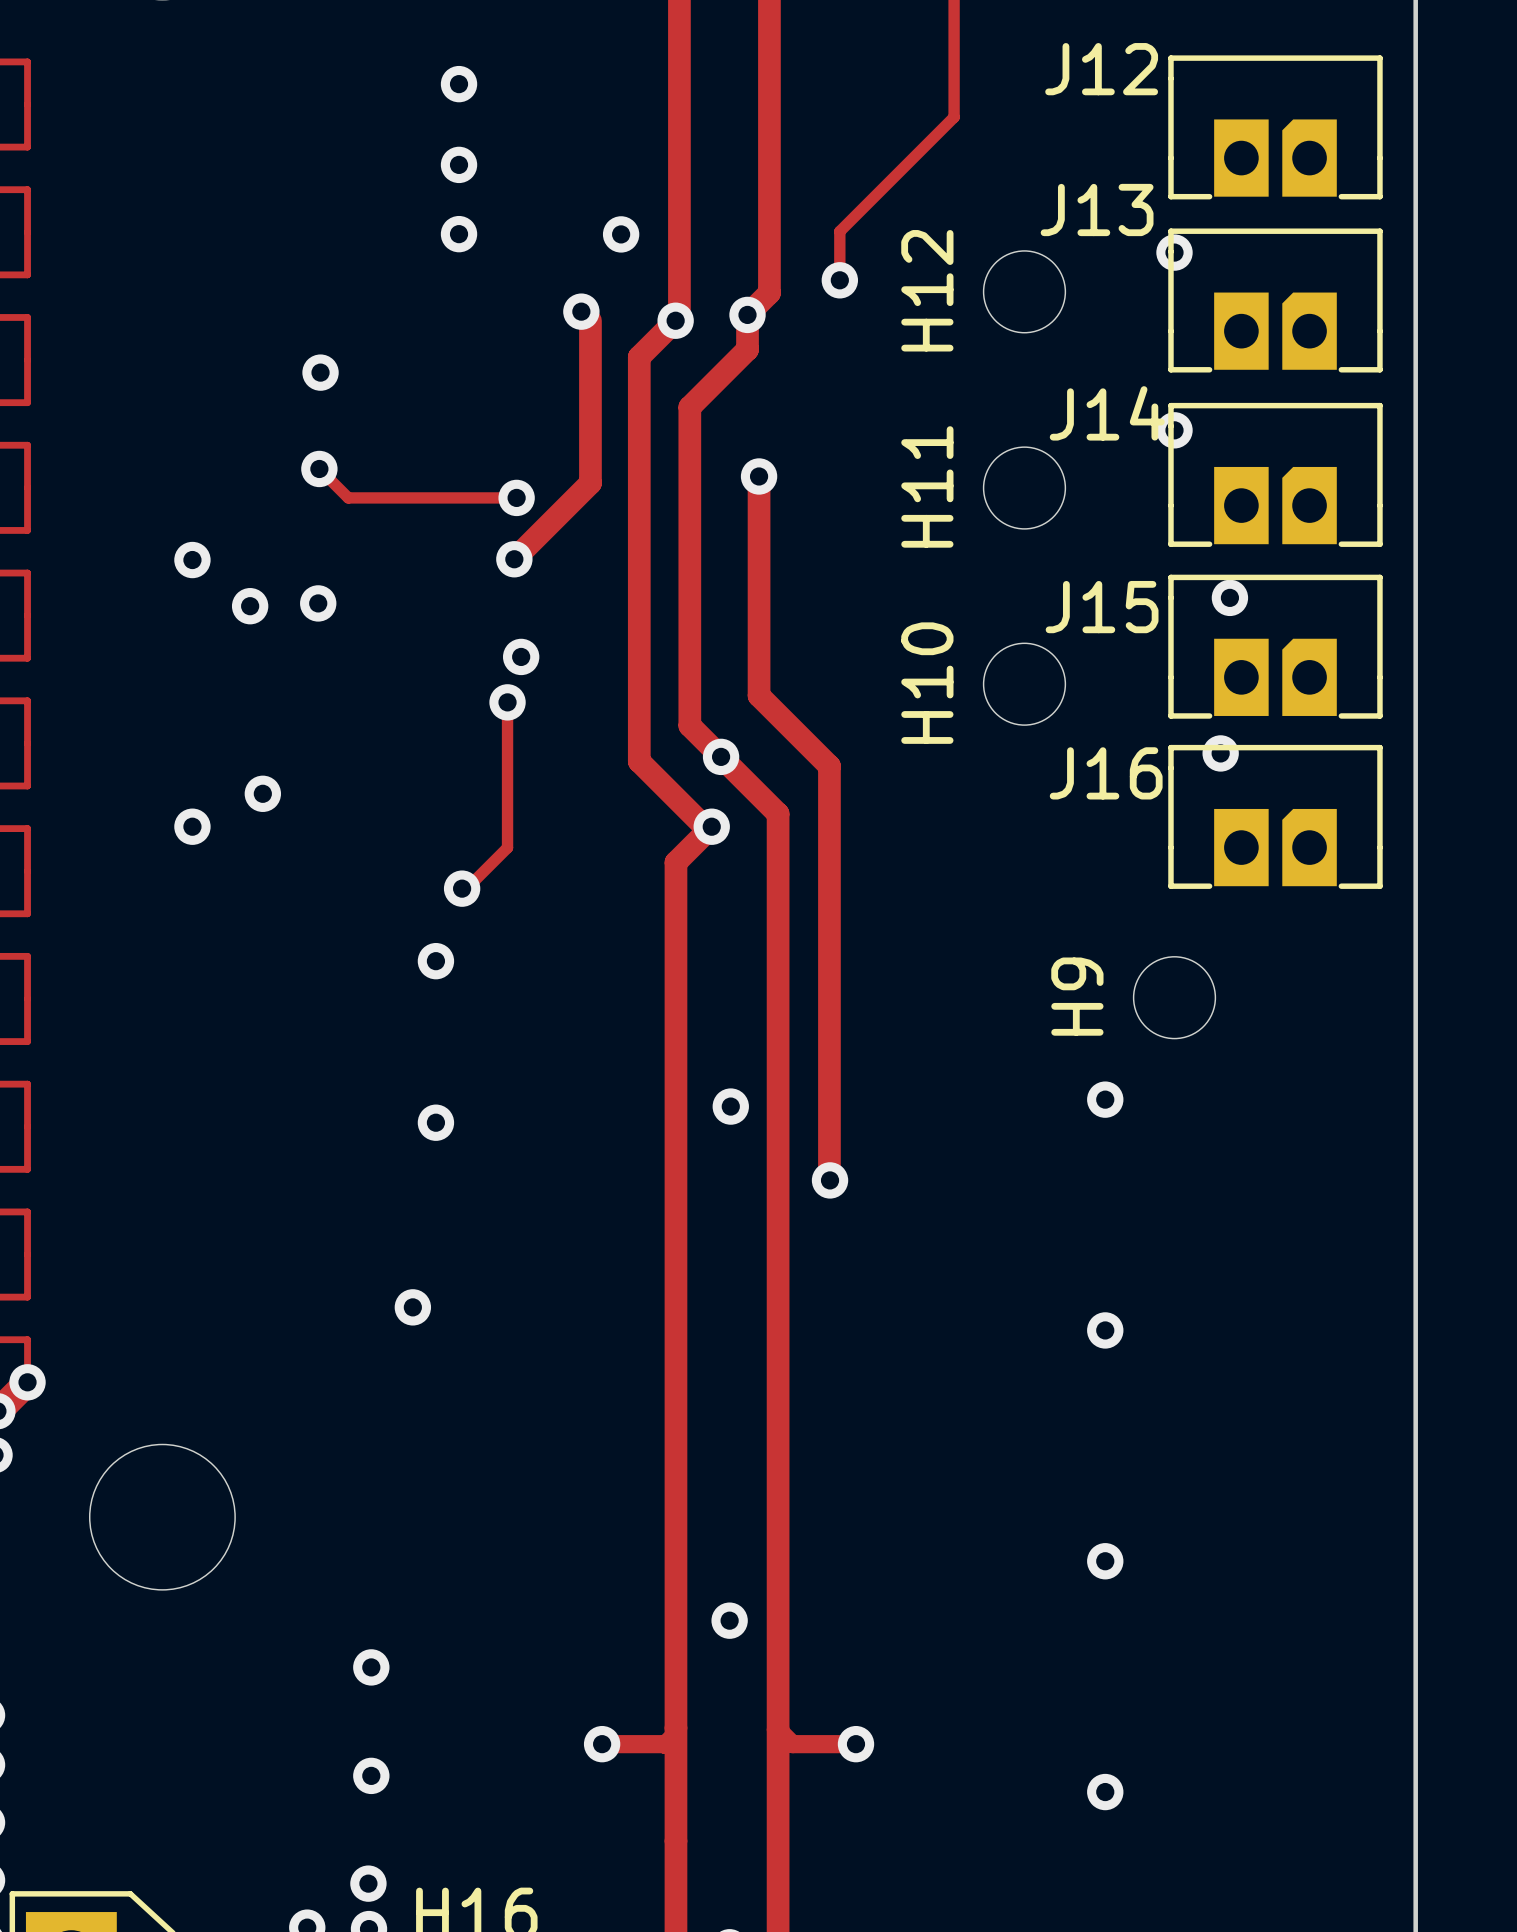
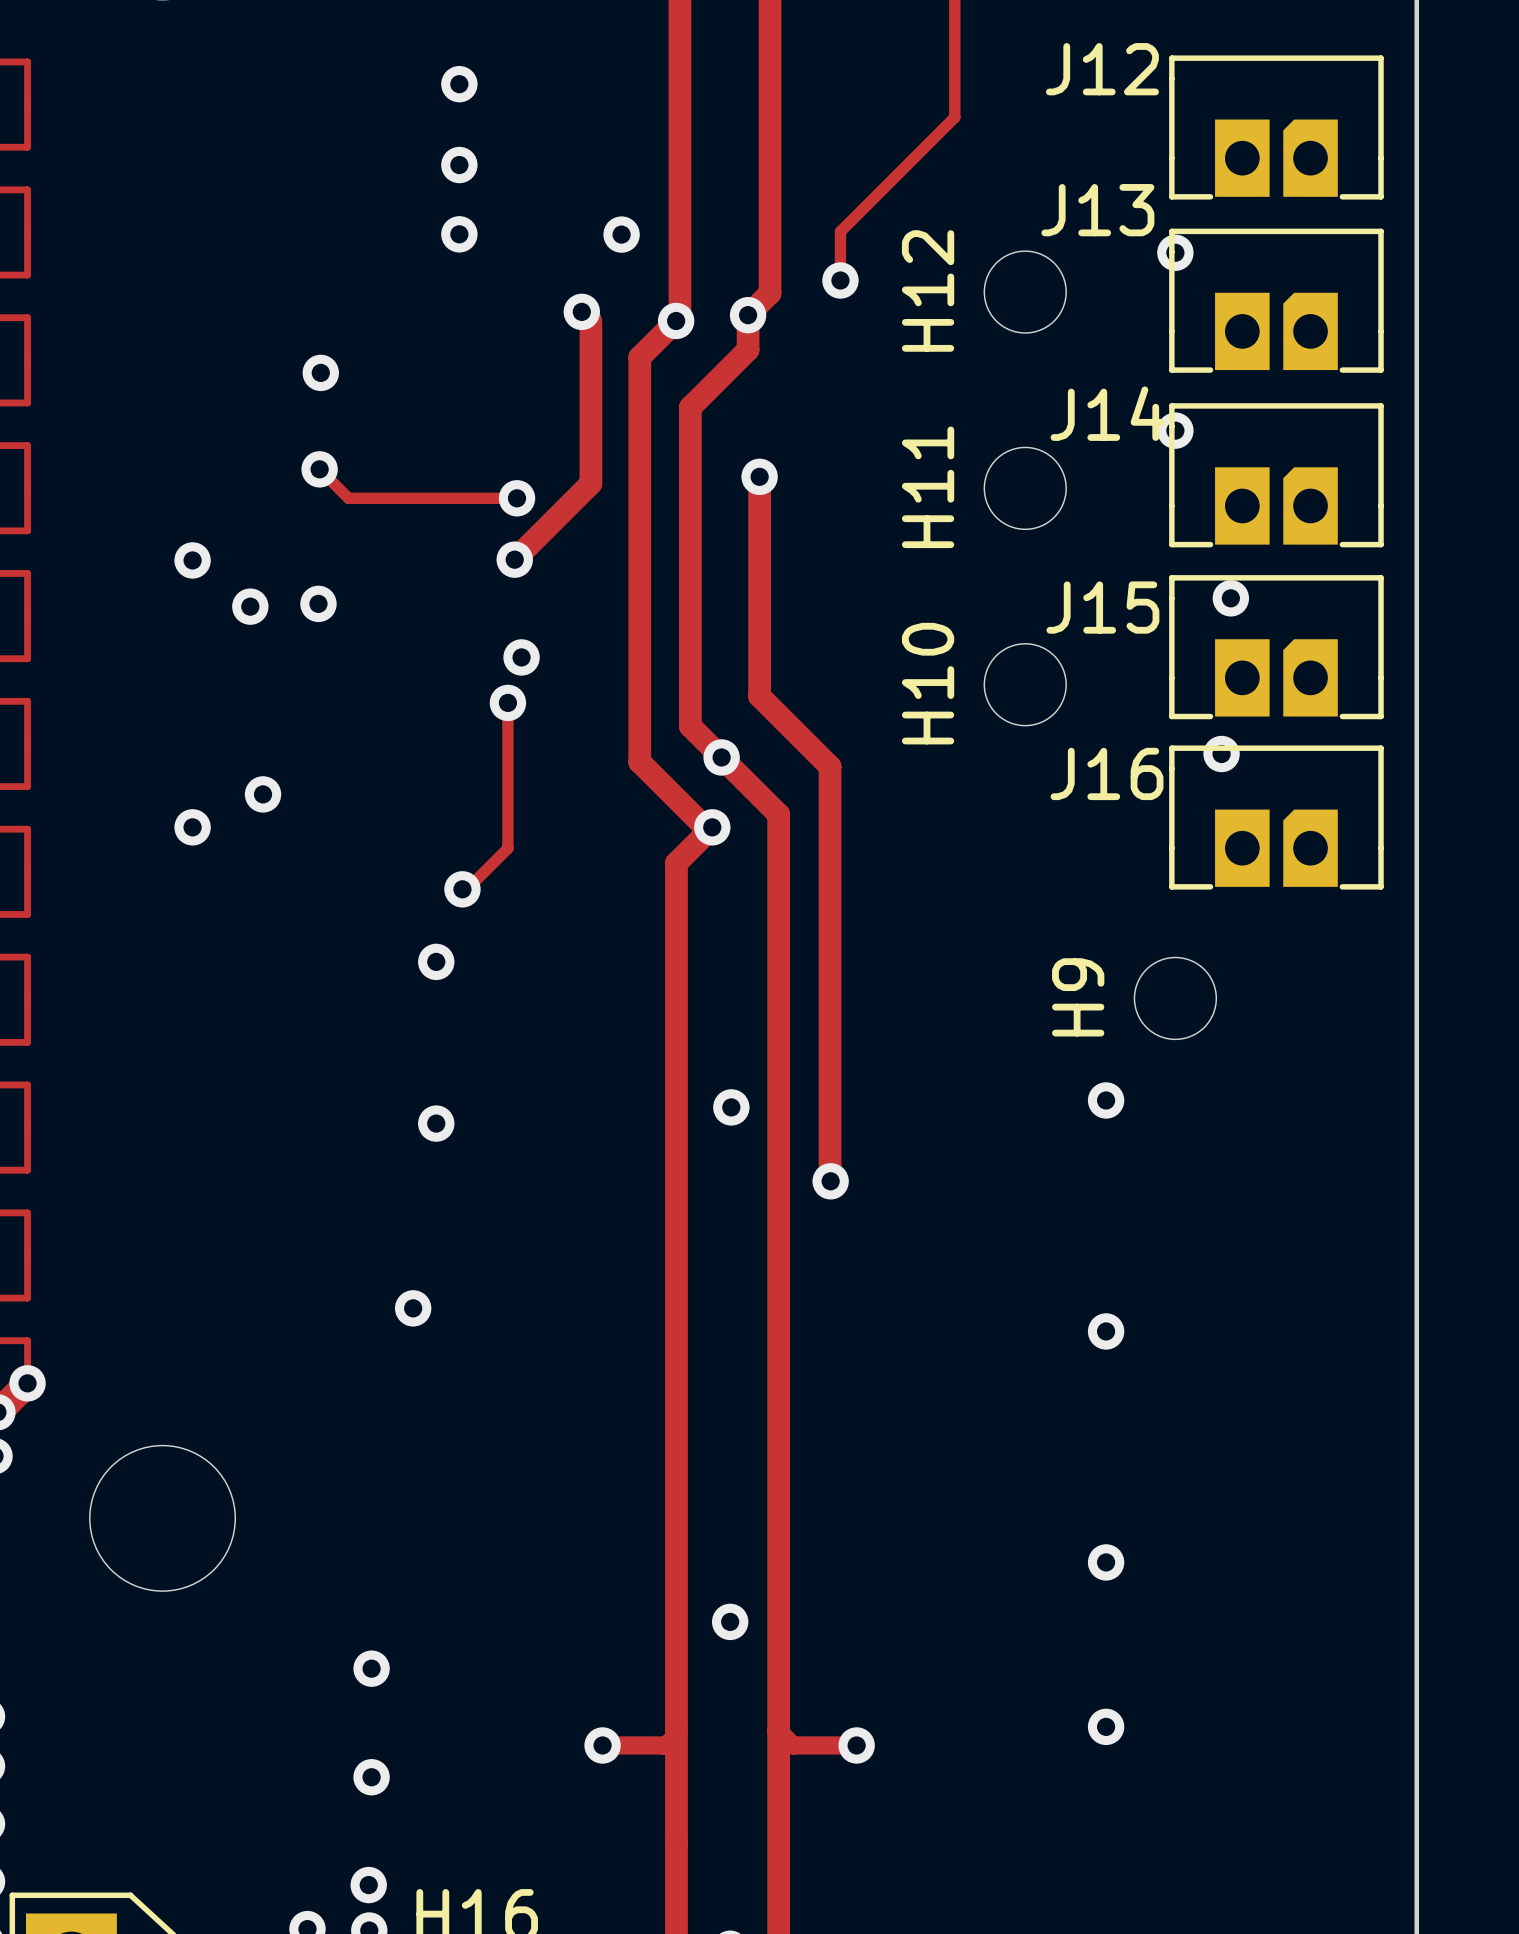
via position: (1105, 1792) -> (1106, 1726)

